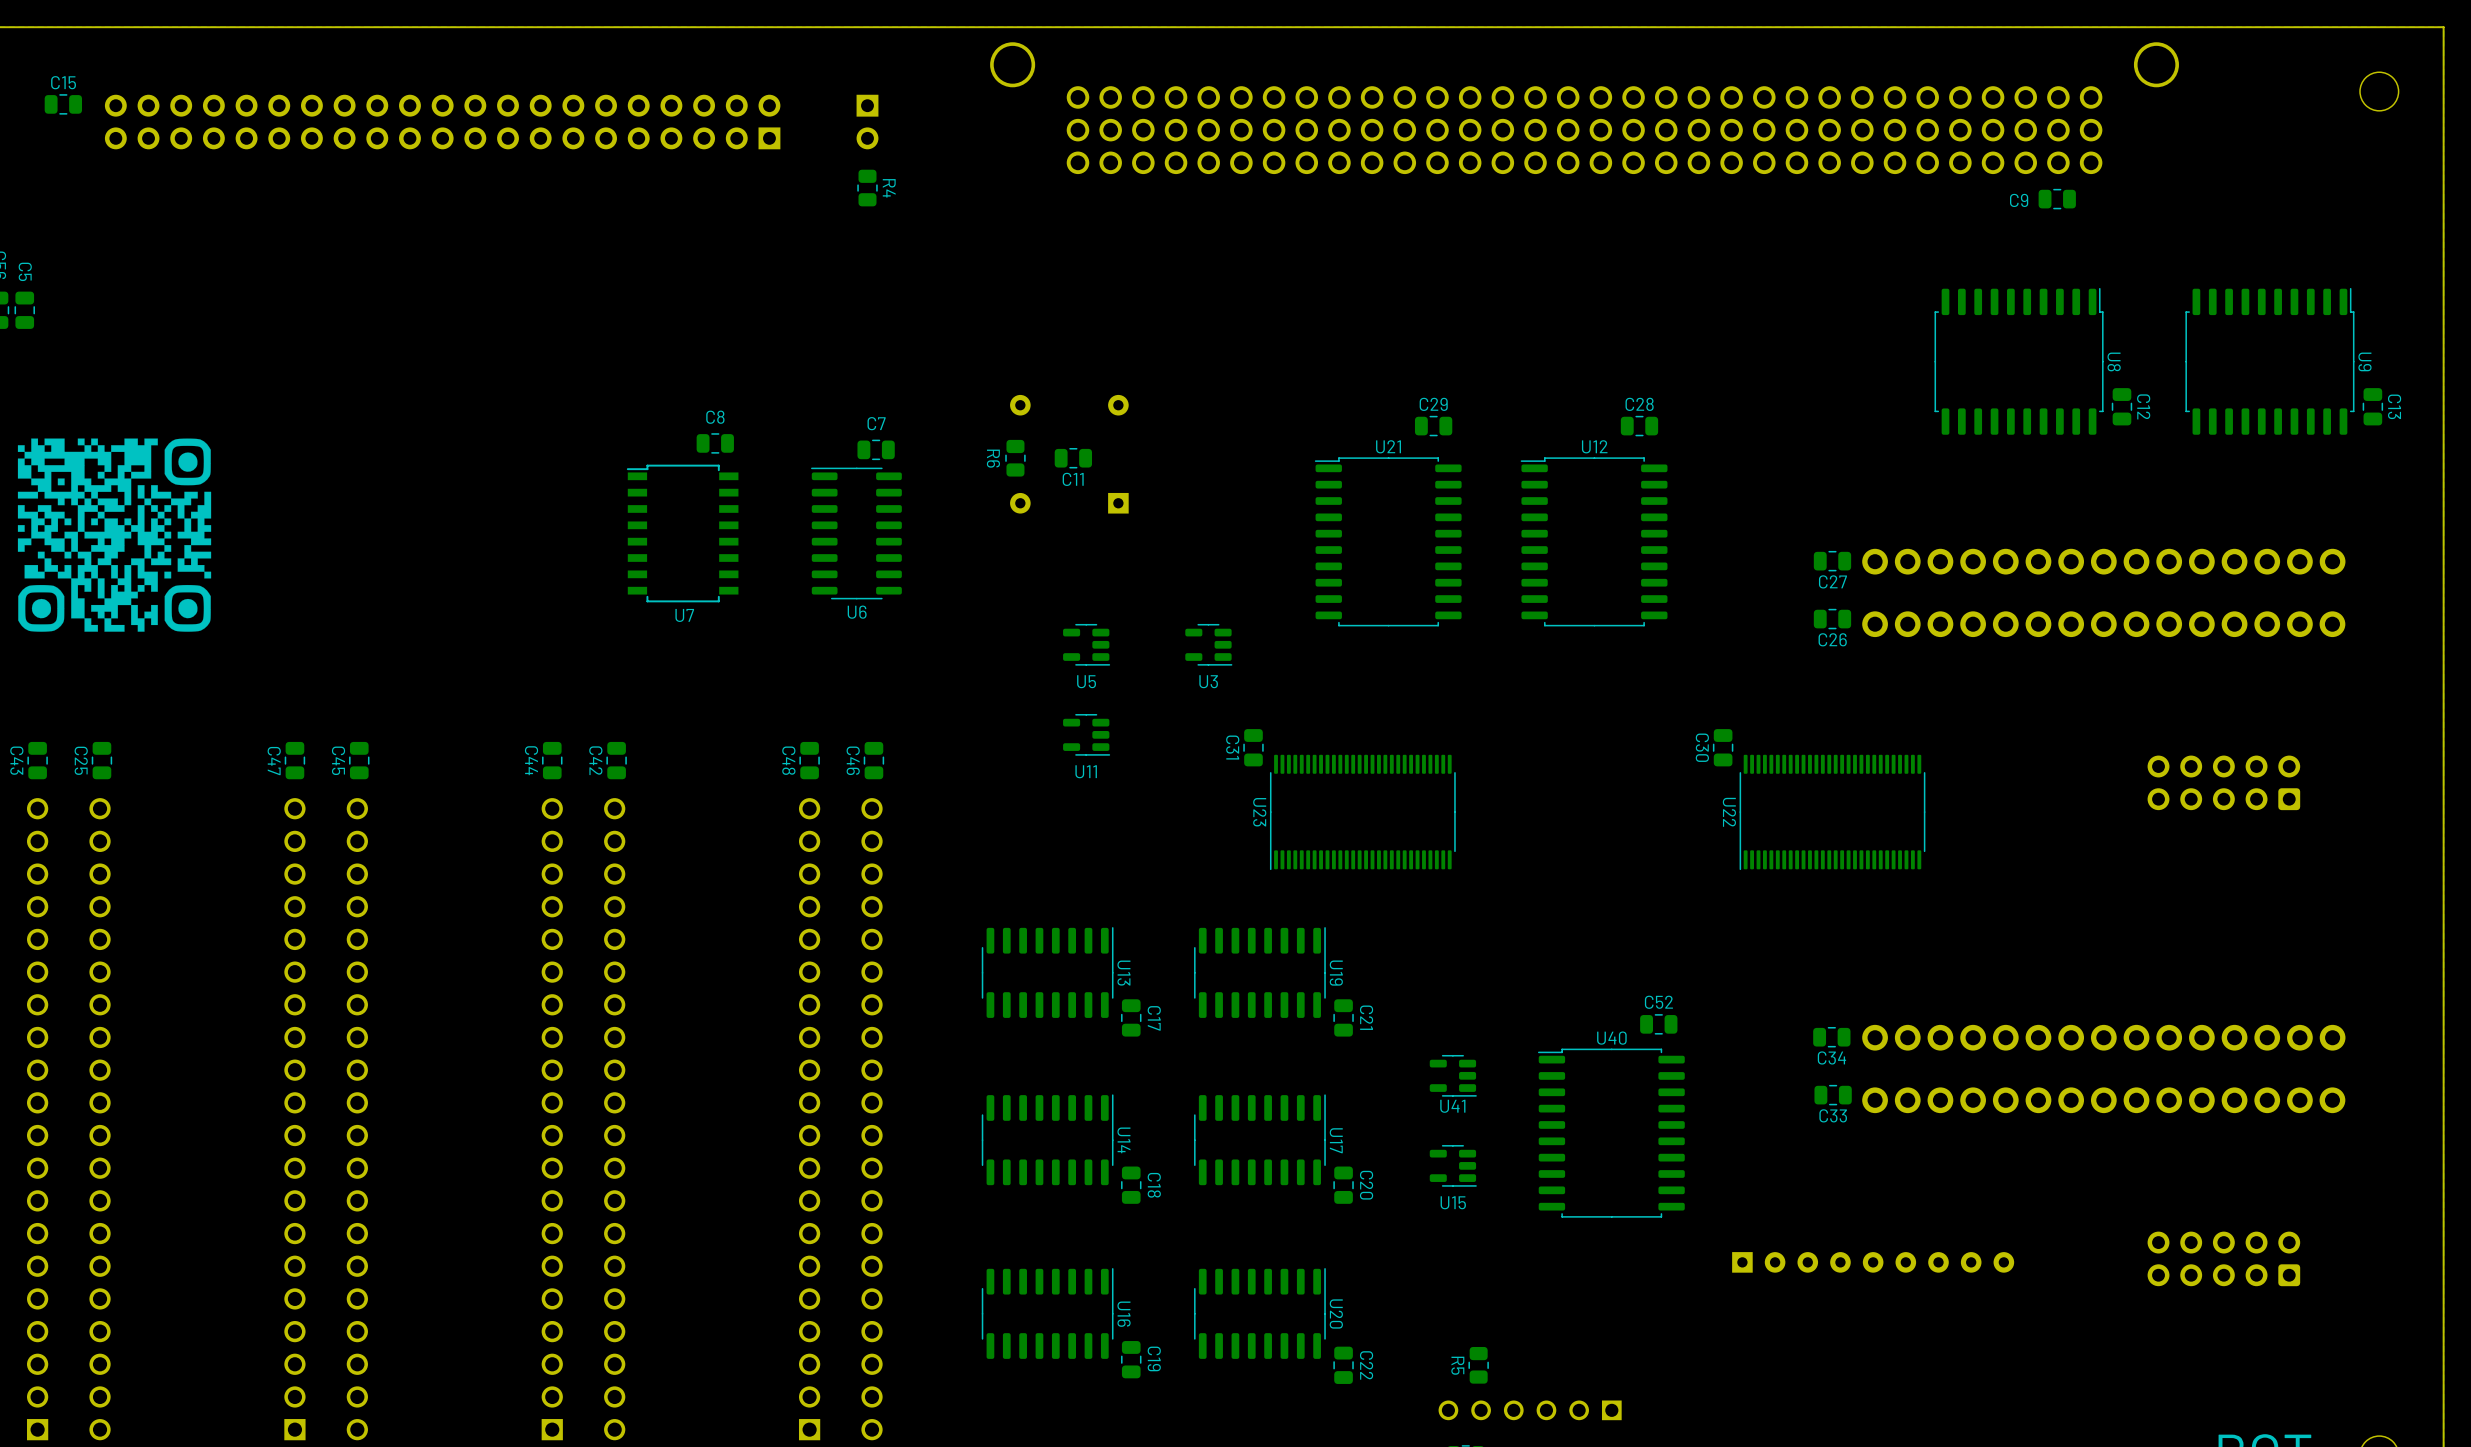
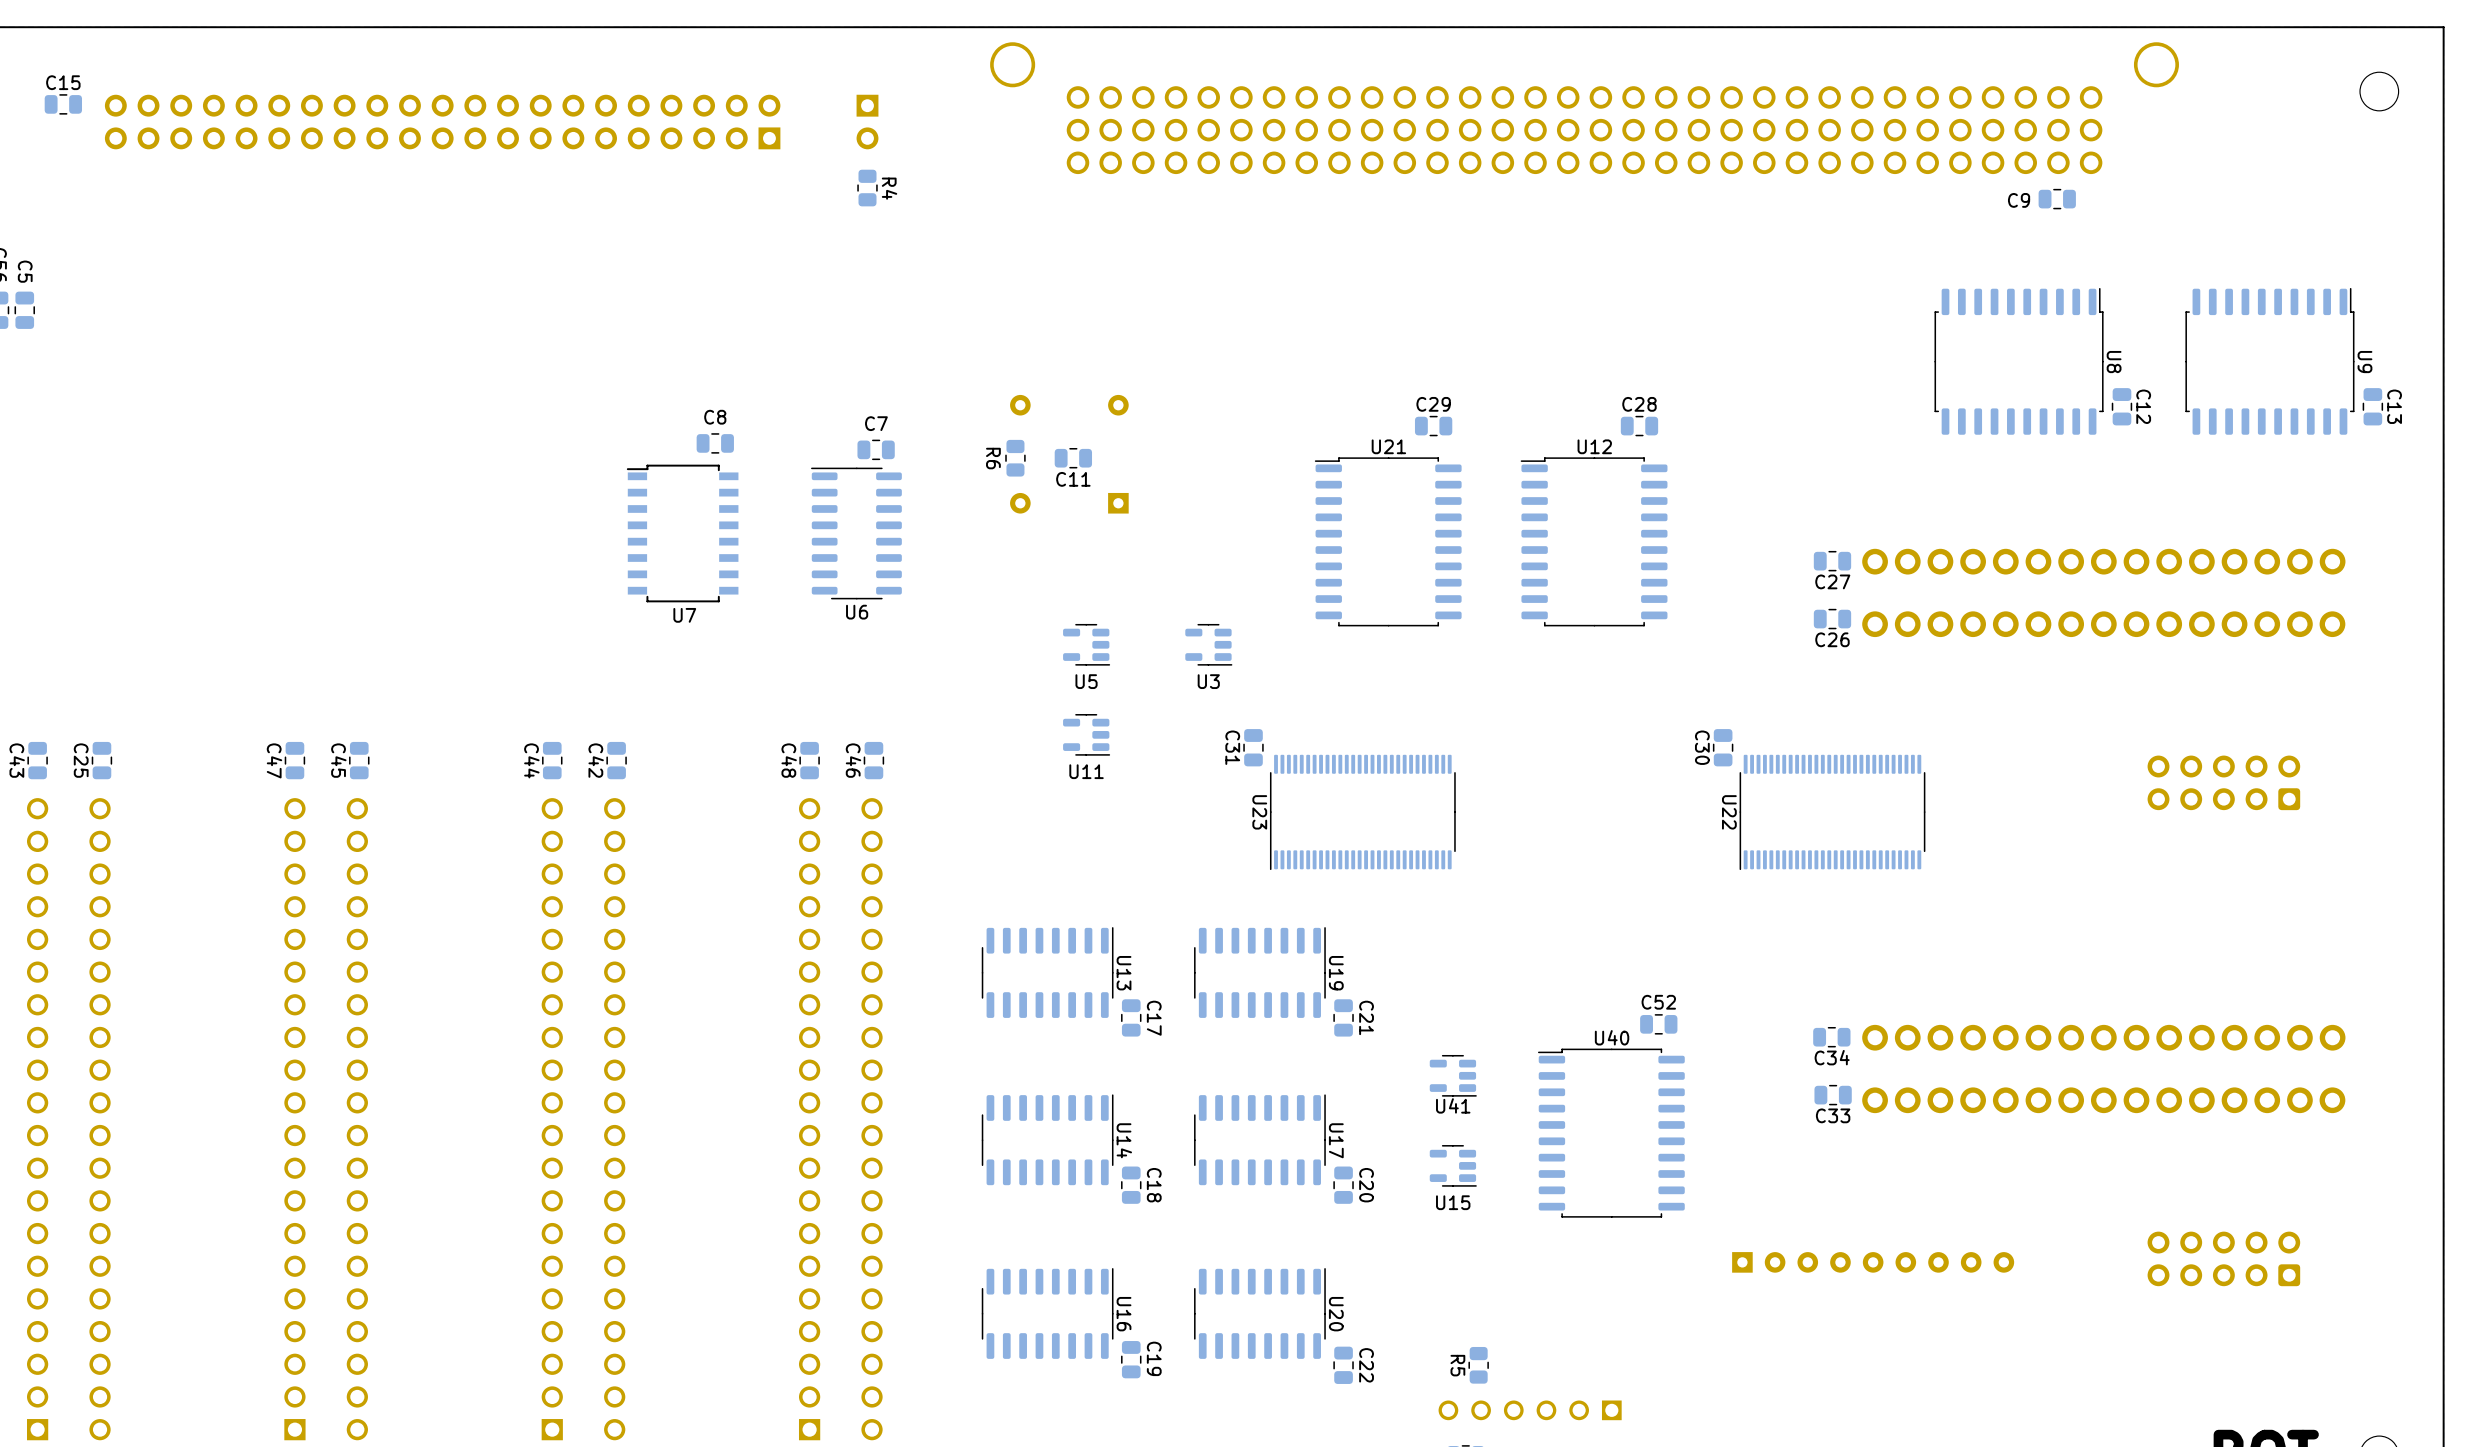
drawing: [17, 438, 212, 632] -> none

